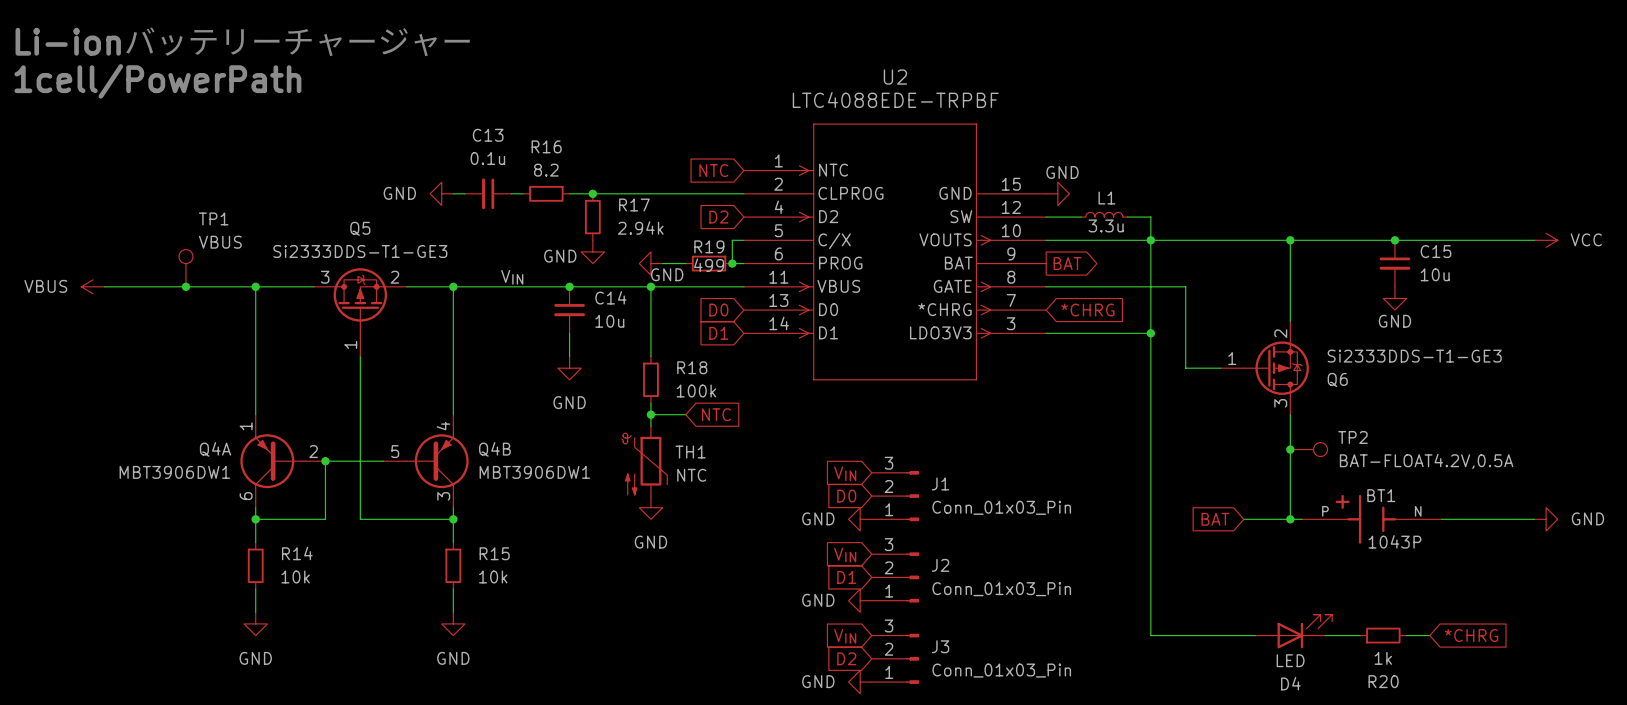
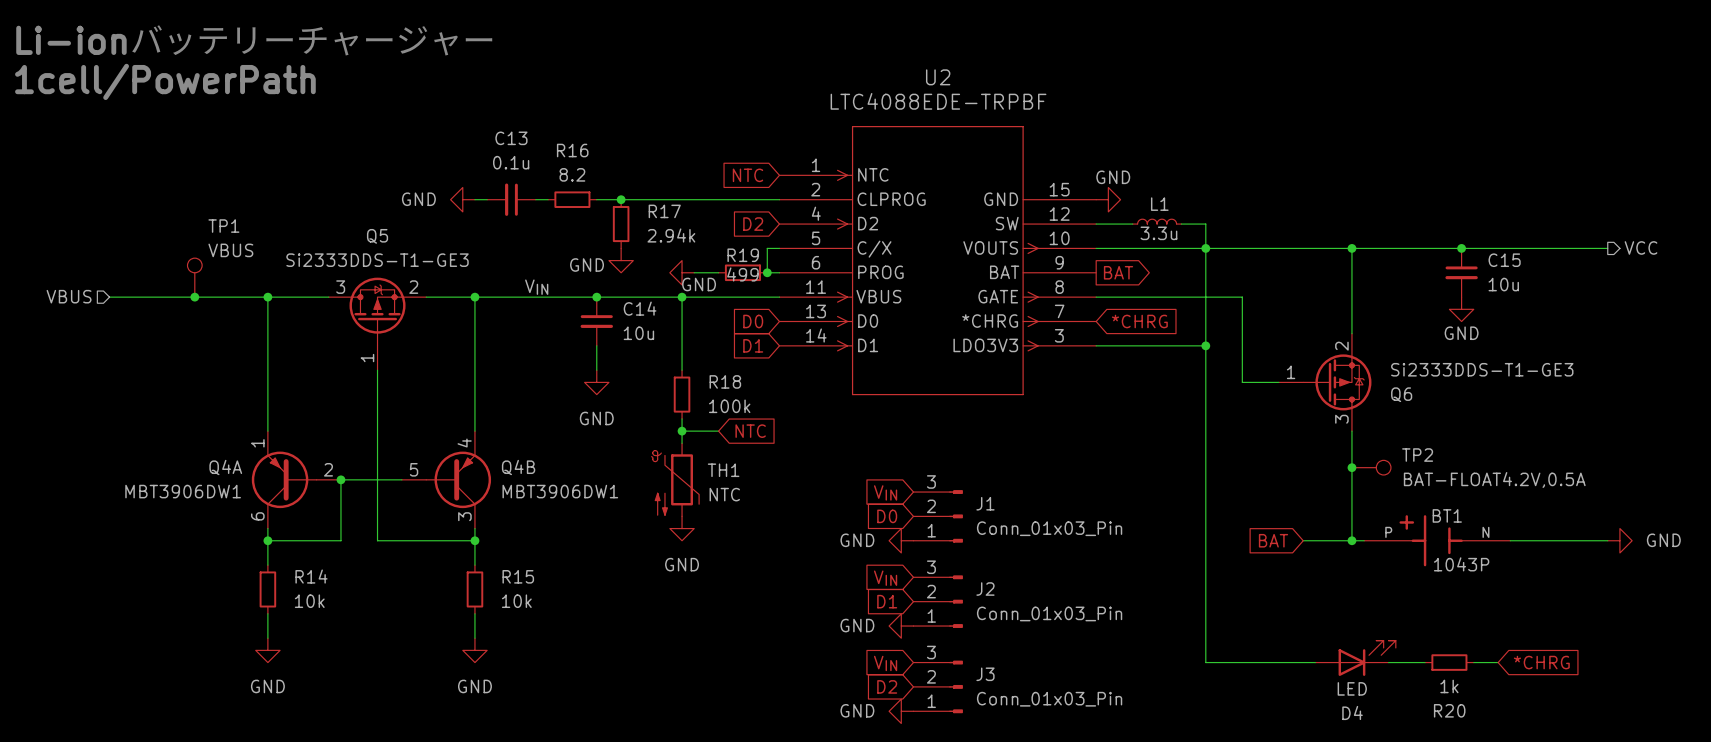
hierarchical label: none -> VCC (1641, 247)
power symbol: VCC (1546, 240) -> none
hierarchical label: none -> VBUS (69, 296)
power symbol: VBUS (92, 286) -> none

